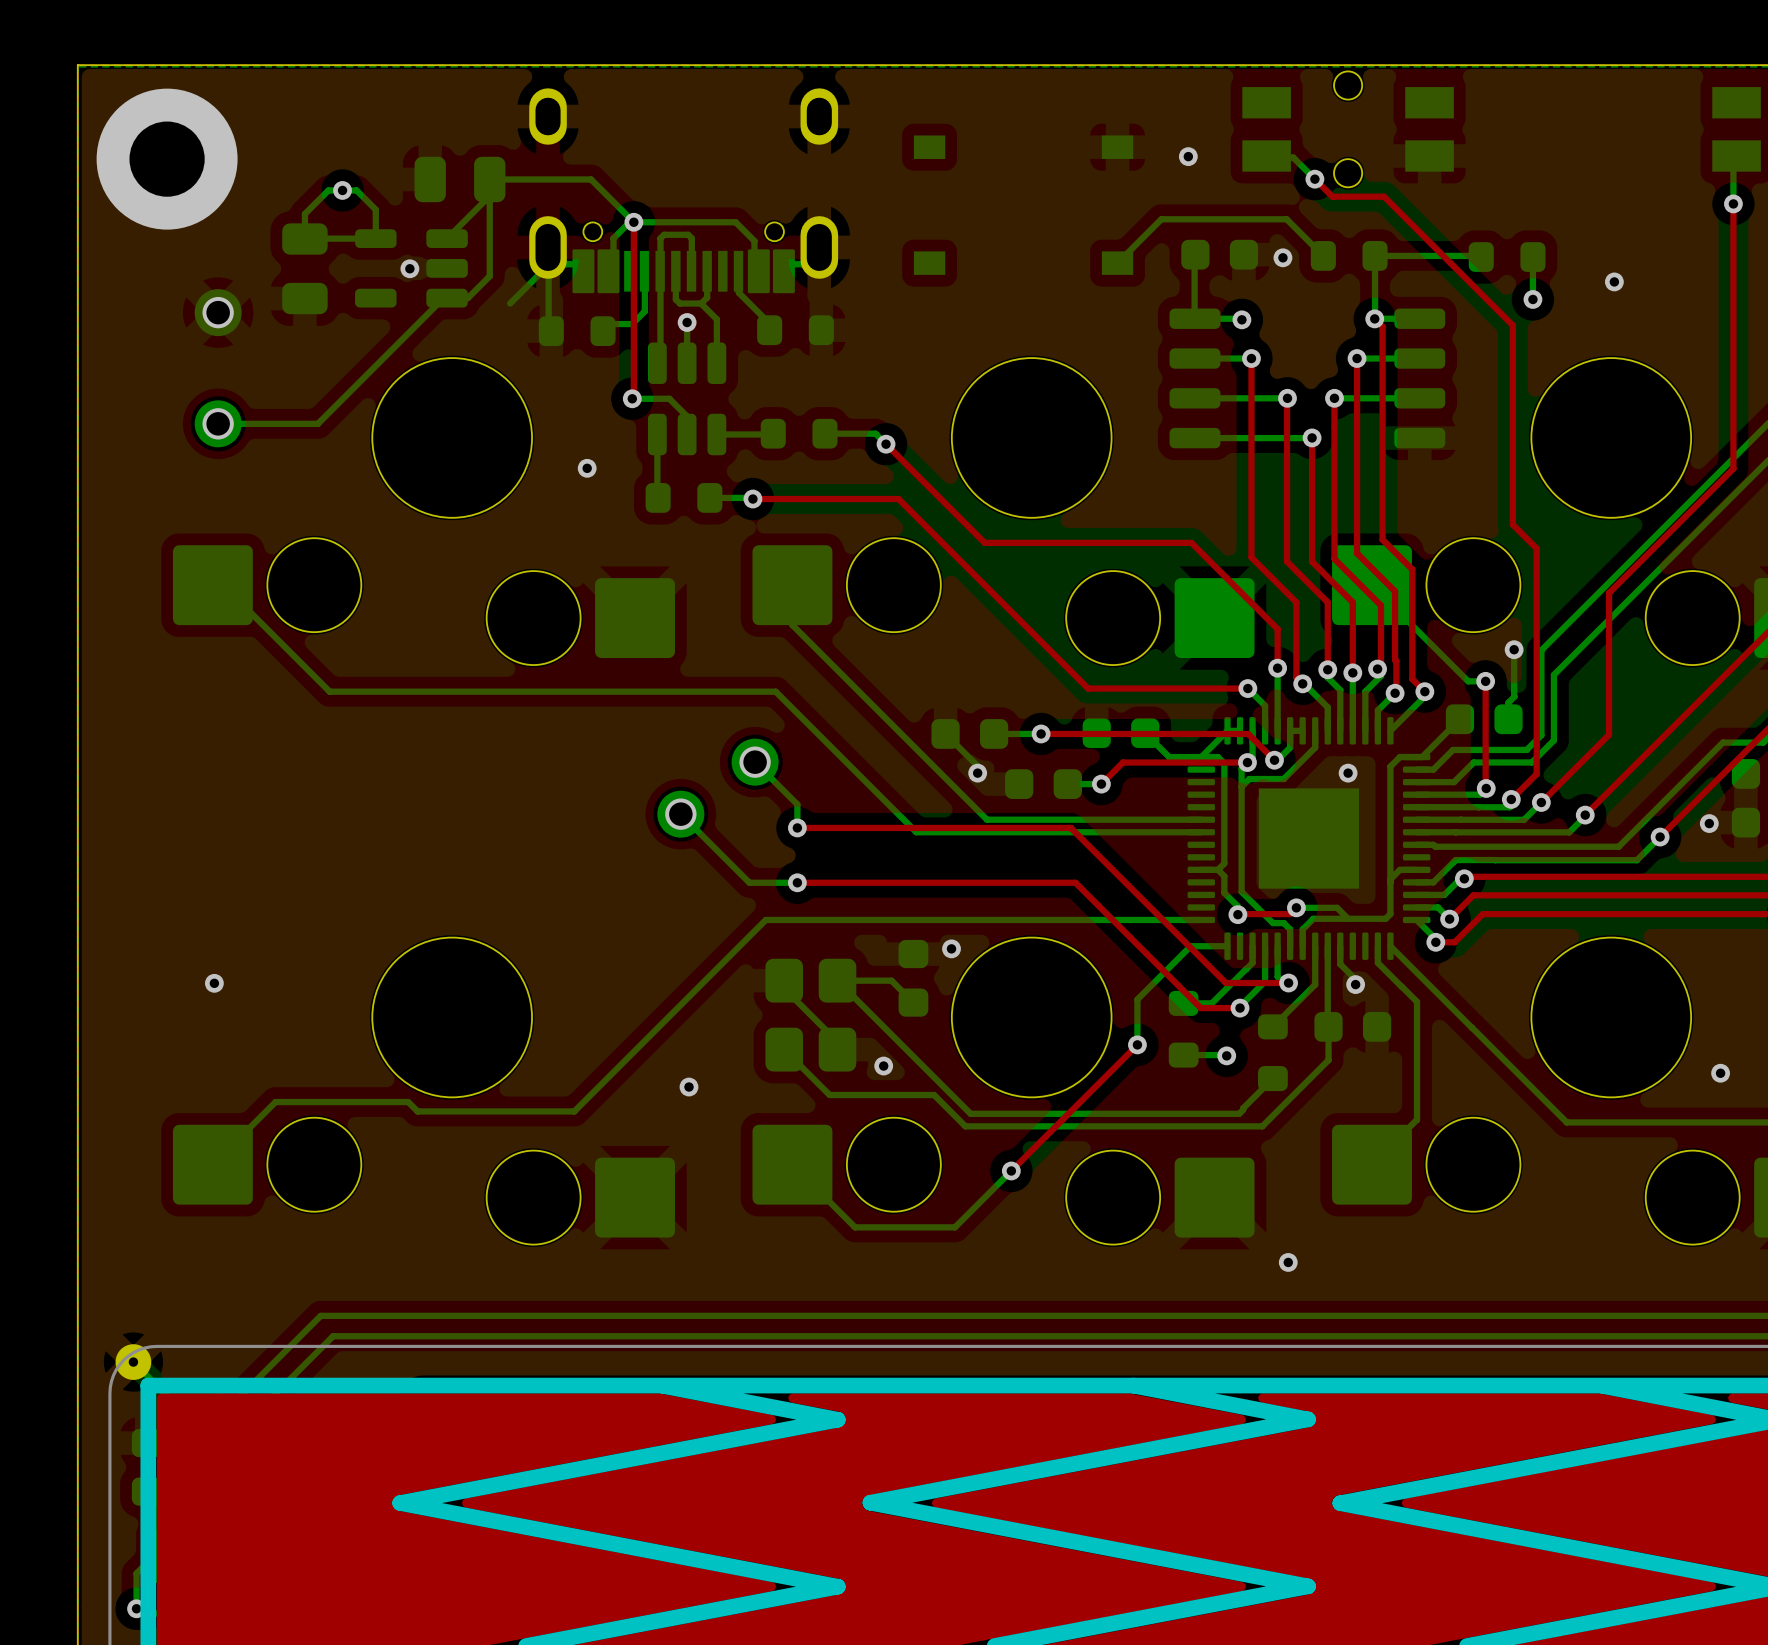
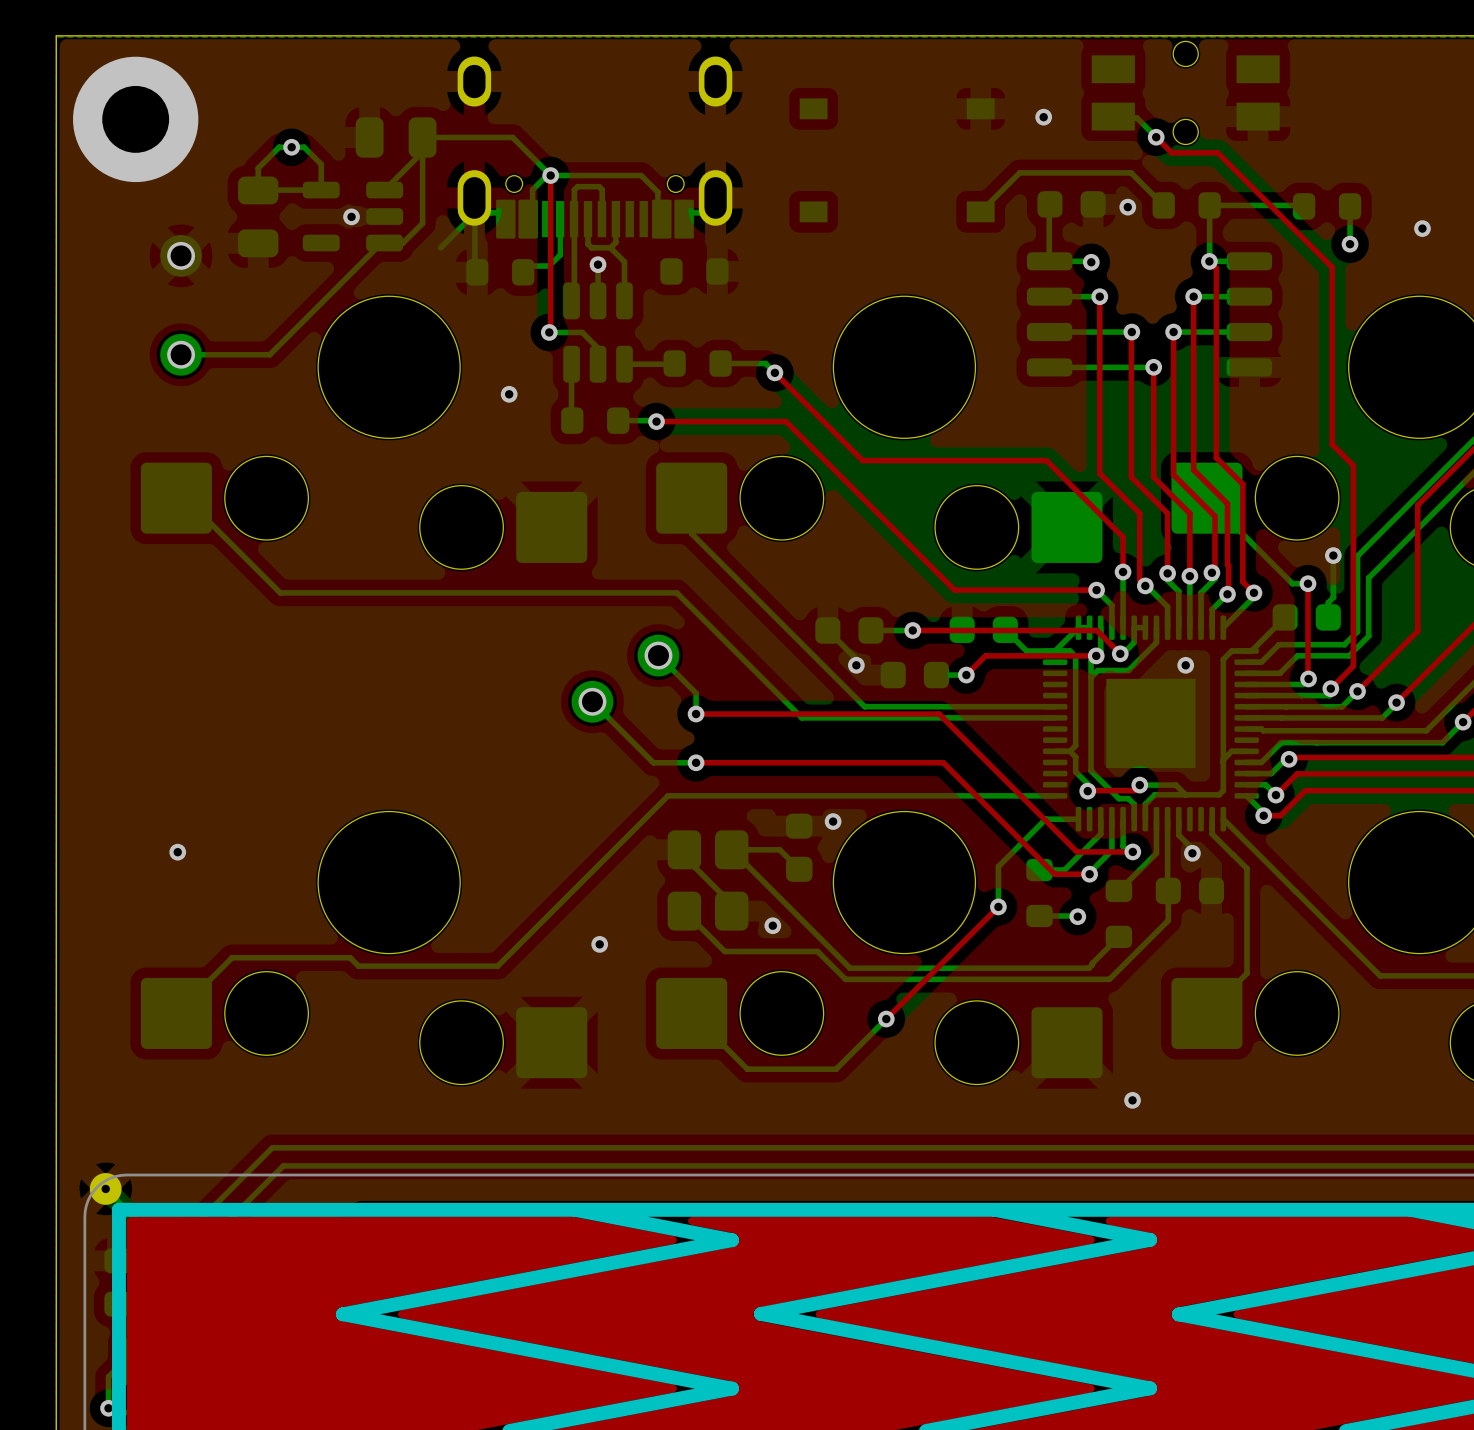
bottom track: (738, 264) (738, 292) (770, 324) -> none

